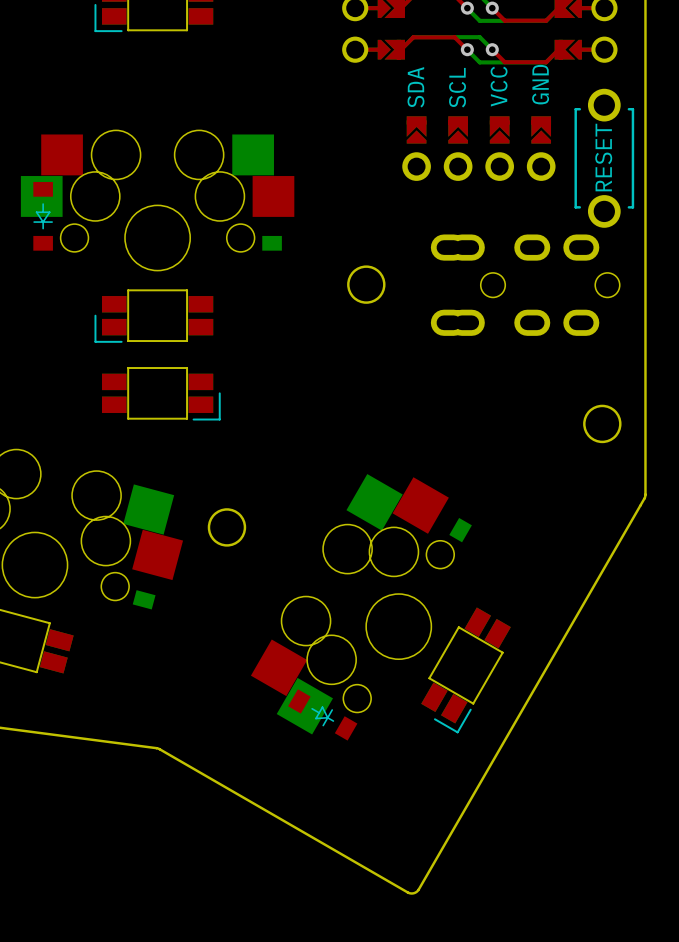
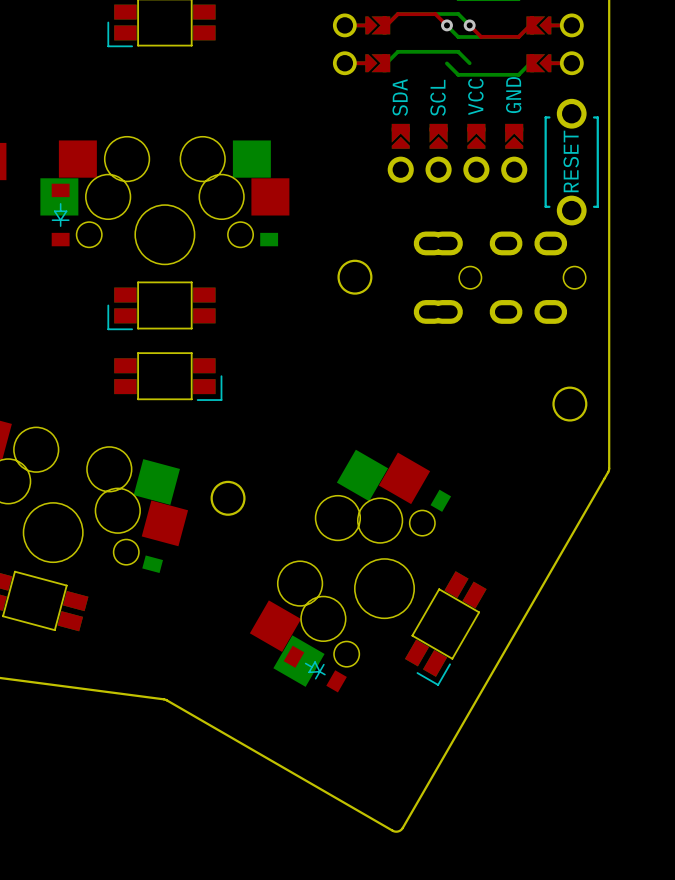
top track: (400, 49) (413, 37) (454, 37) (467, 49) -> none
via: (467, 49) -> none
top track: (492, 49) (504, 62) (546, 62) (558, 49) -> none
via: (492, 49) -> none

